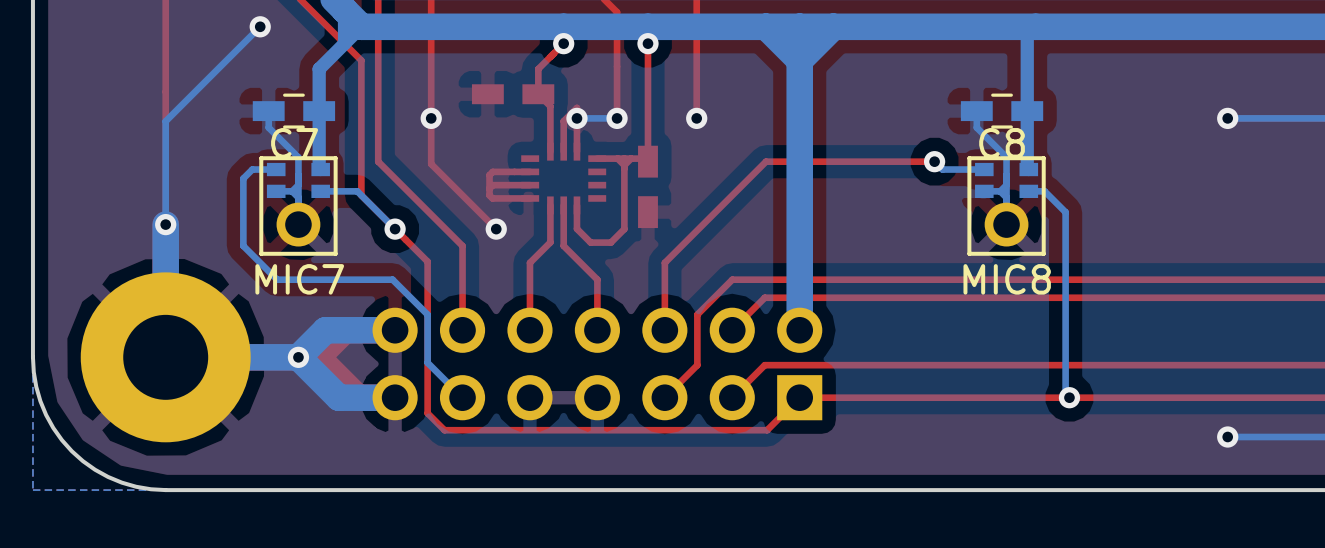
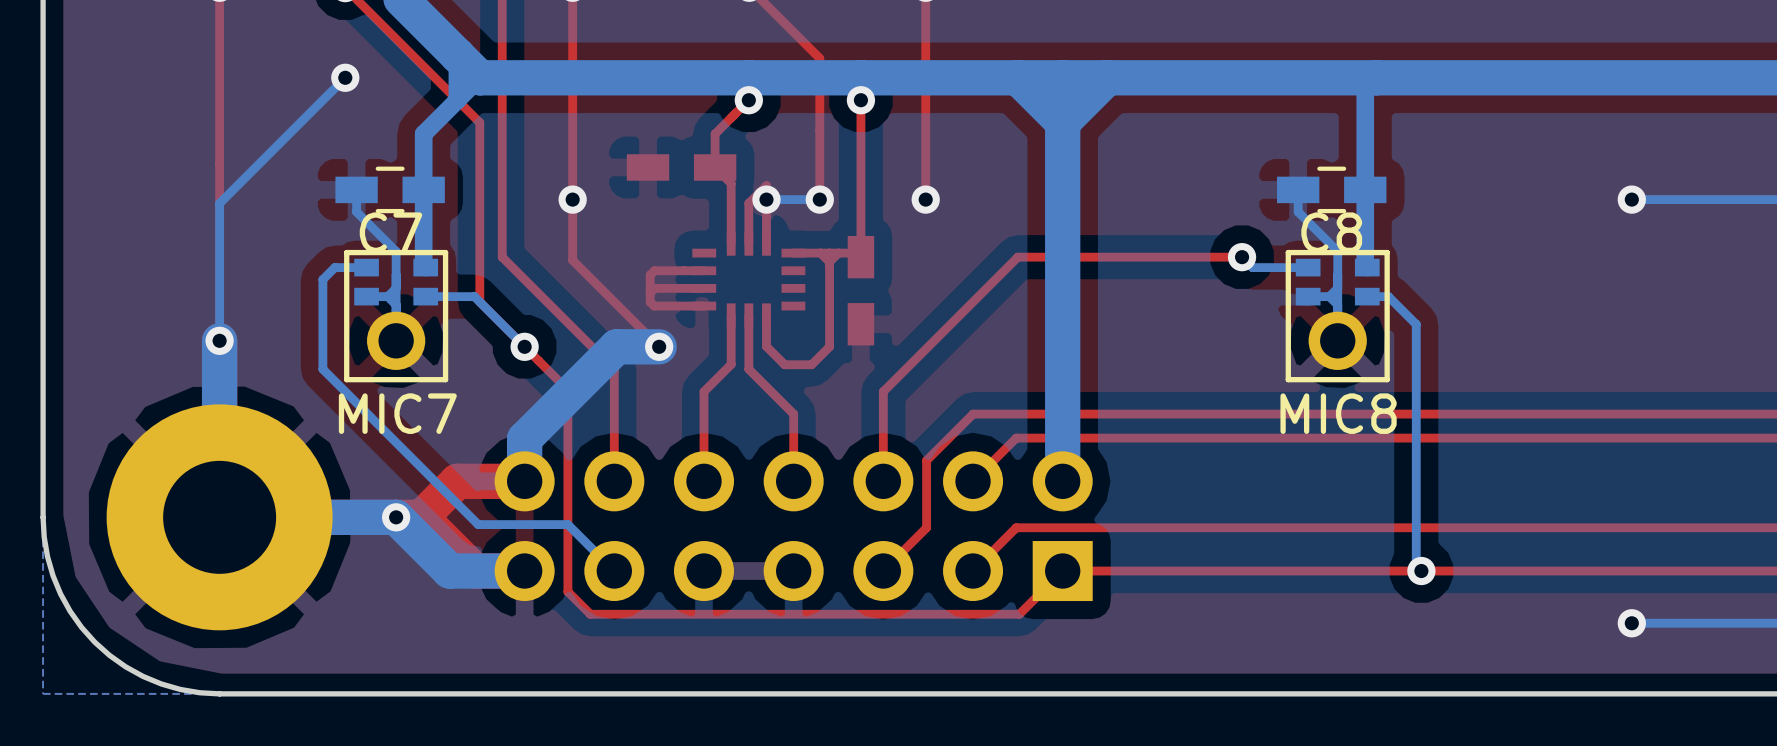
bottom track: (277, 279) (392, 279) (427, 314) (427, 362) -> (367, 414) (478, 524) (567, 524)
bottom track: (395, 330) (325, 330) (298, 357) -> (524, 481) (524, 438) (616, 346) (659, 346)

